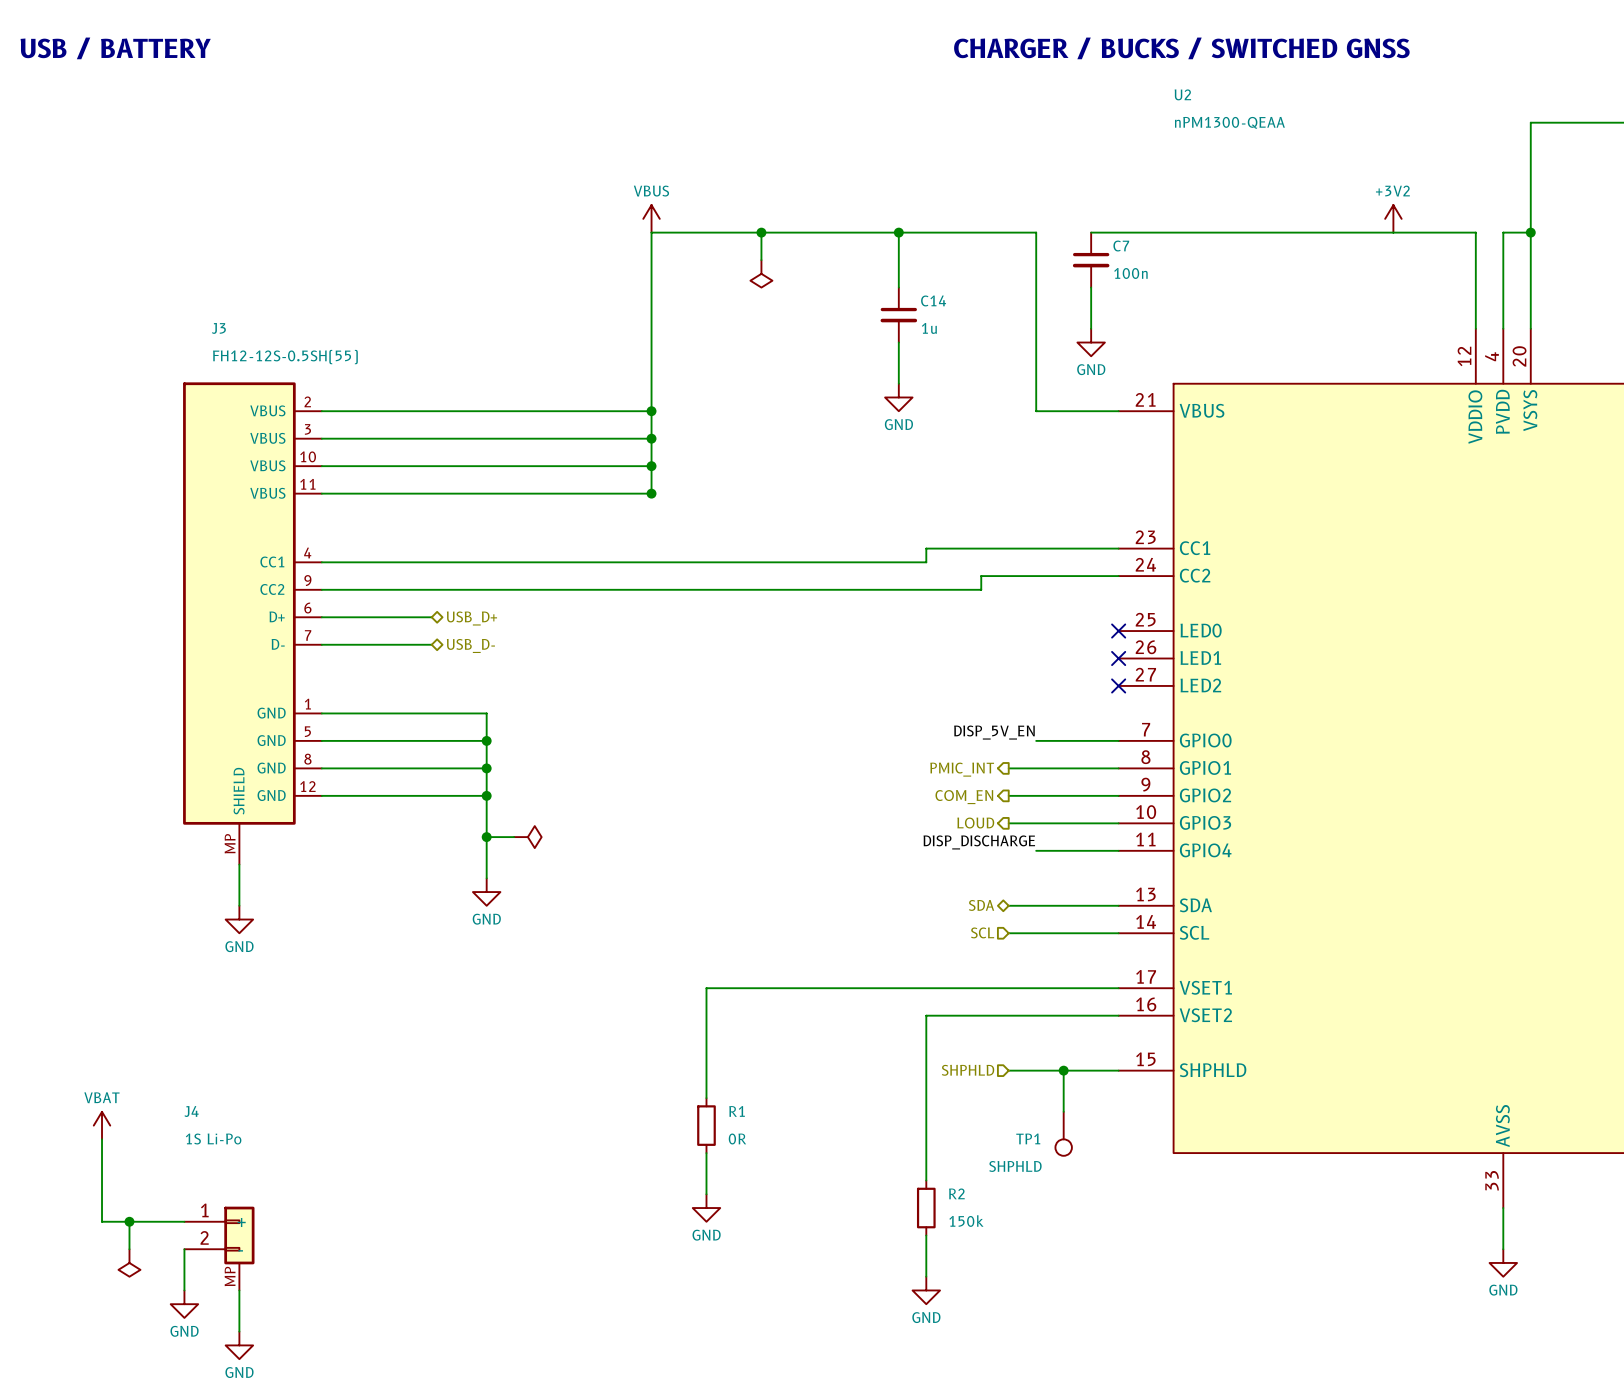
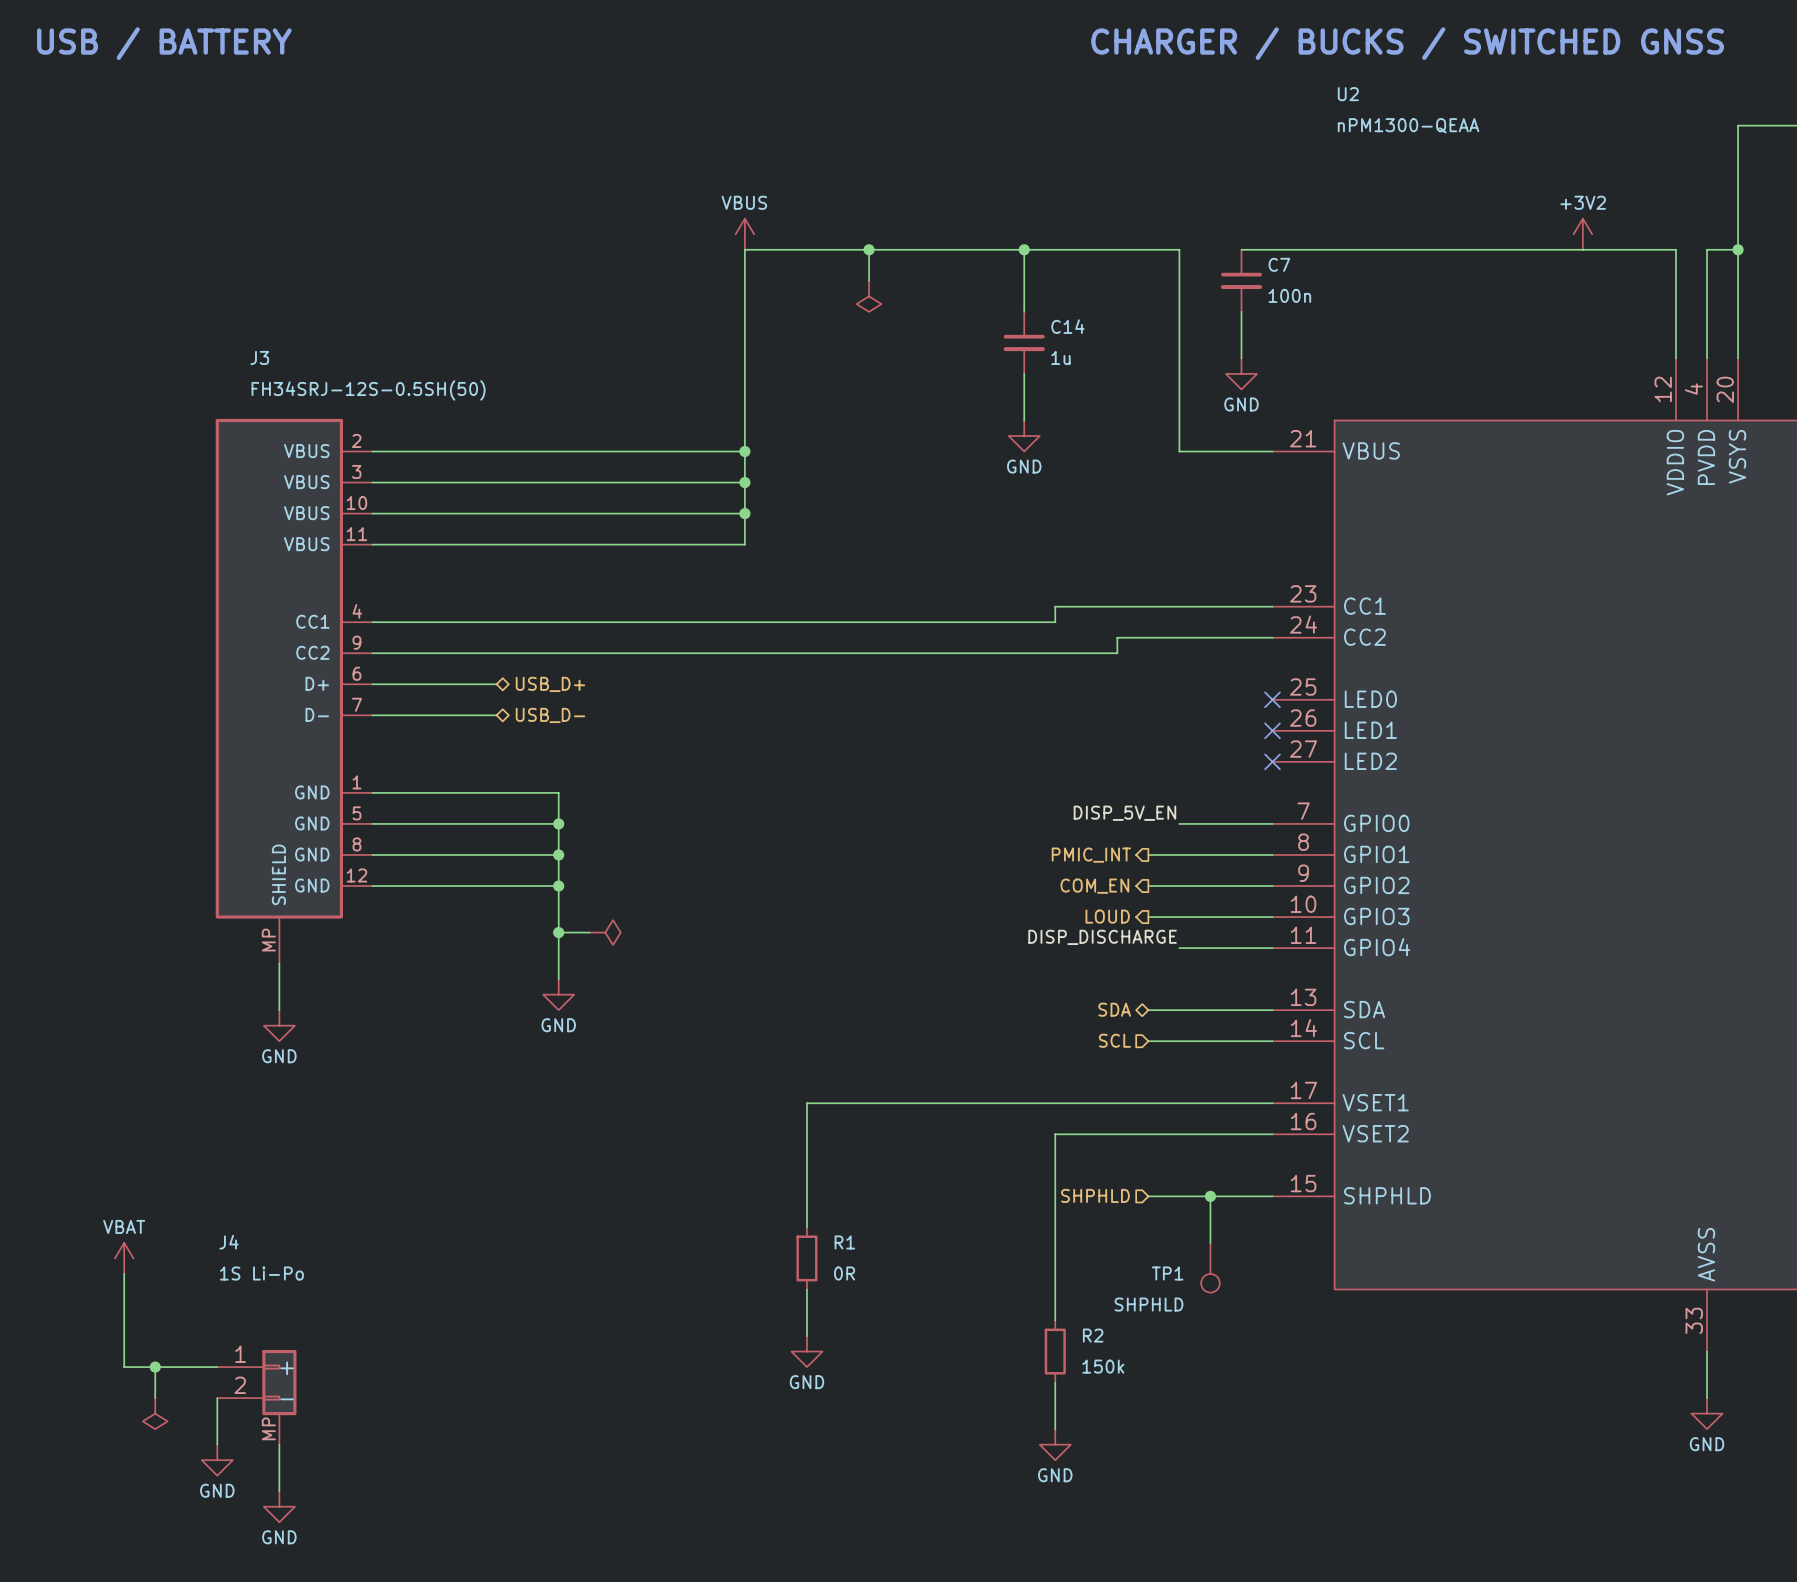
J3 value: FH12-12S-0.5SH(55) (285, 357) -> FH34SRJ-12S-0.5SH(50) (368, 390)
junction: (651, 493) -> none

